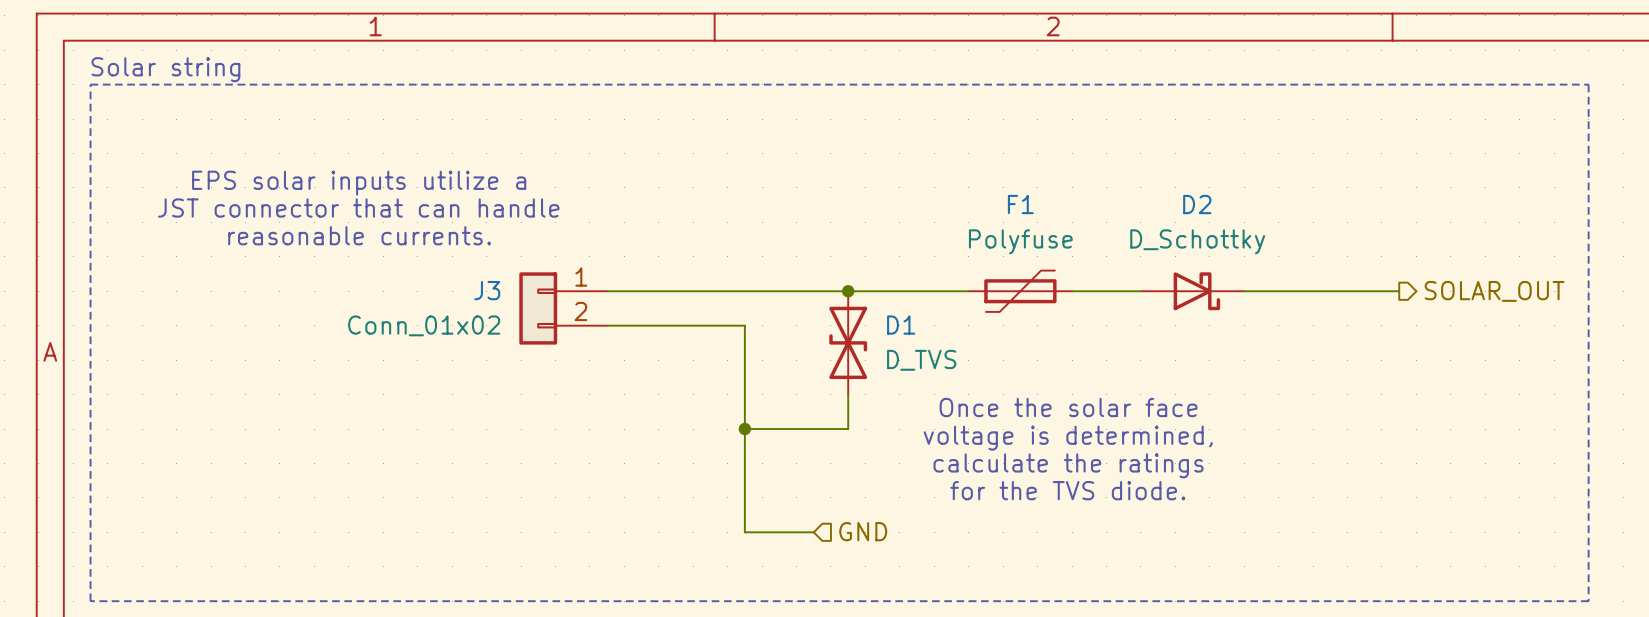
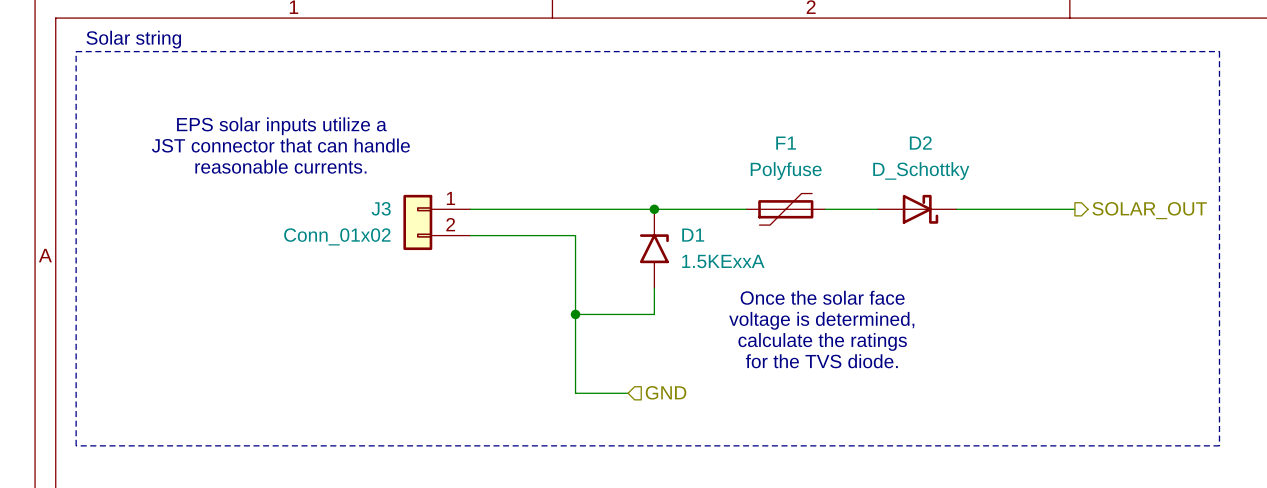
D1 symbol: [829, 291, 868, 395] -> [639, 209, 669, 289]
D1 value: D_TVS (921, 360) -> 1.5KExxA (723, 261)

